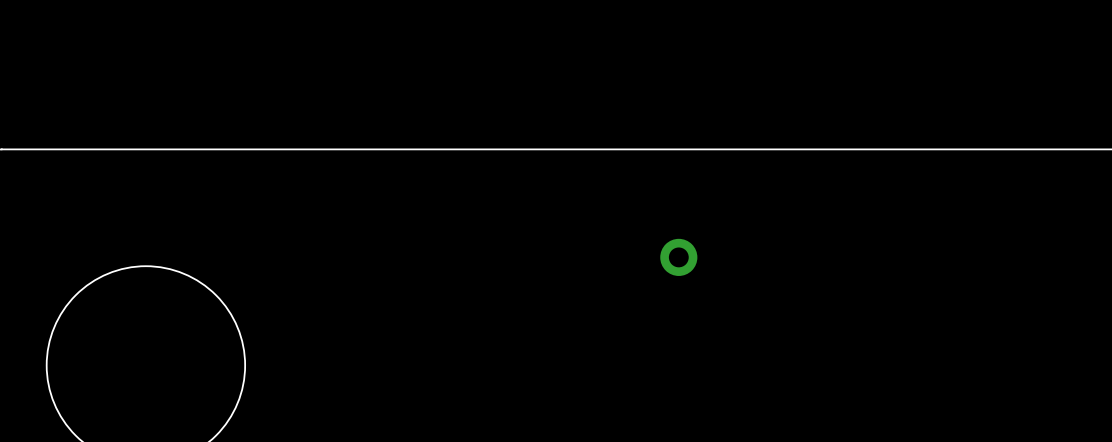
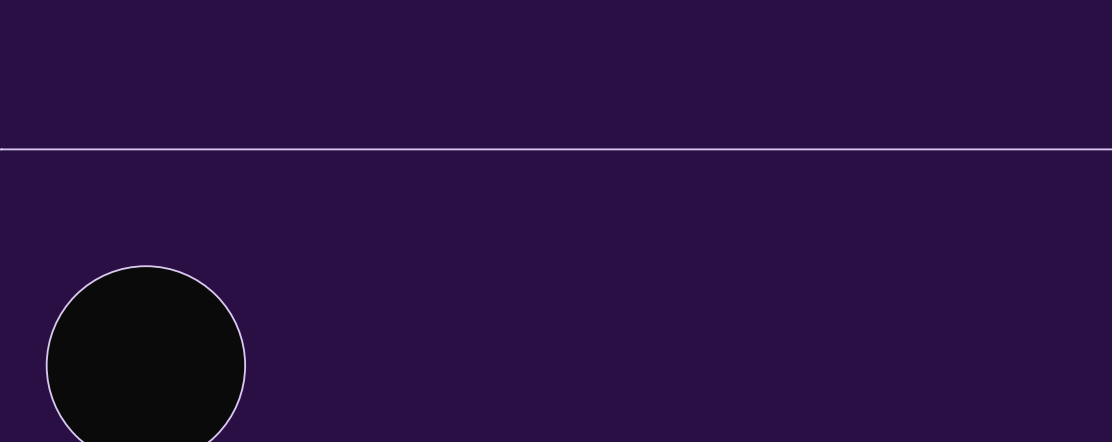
via: (678, 257) -> none

